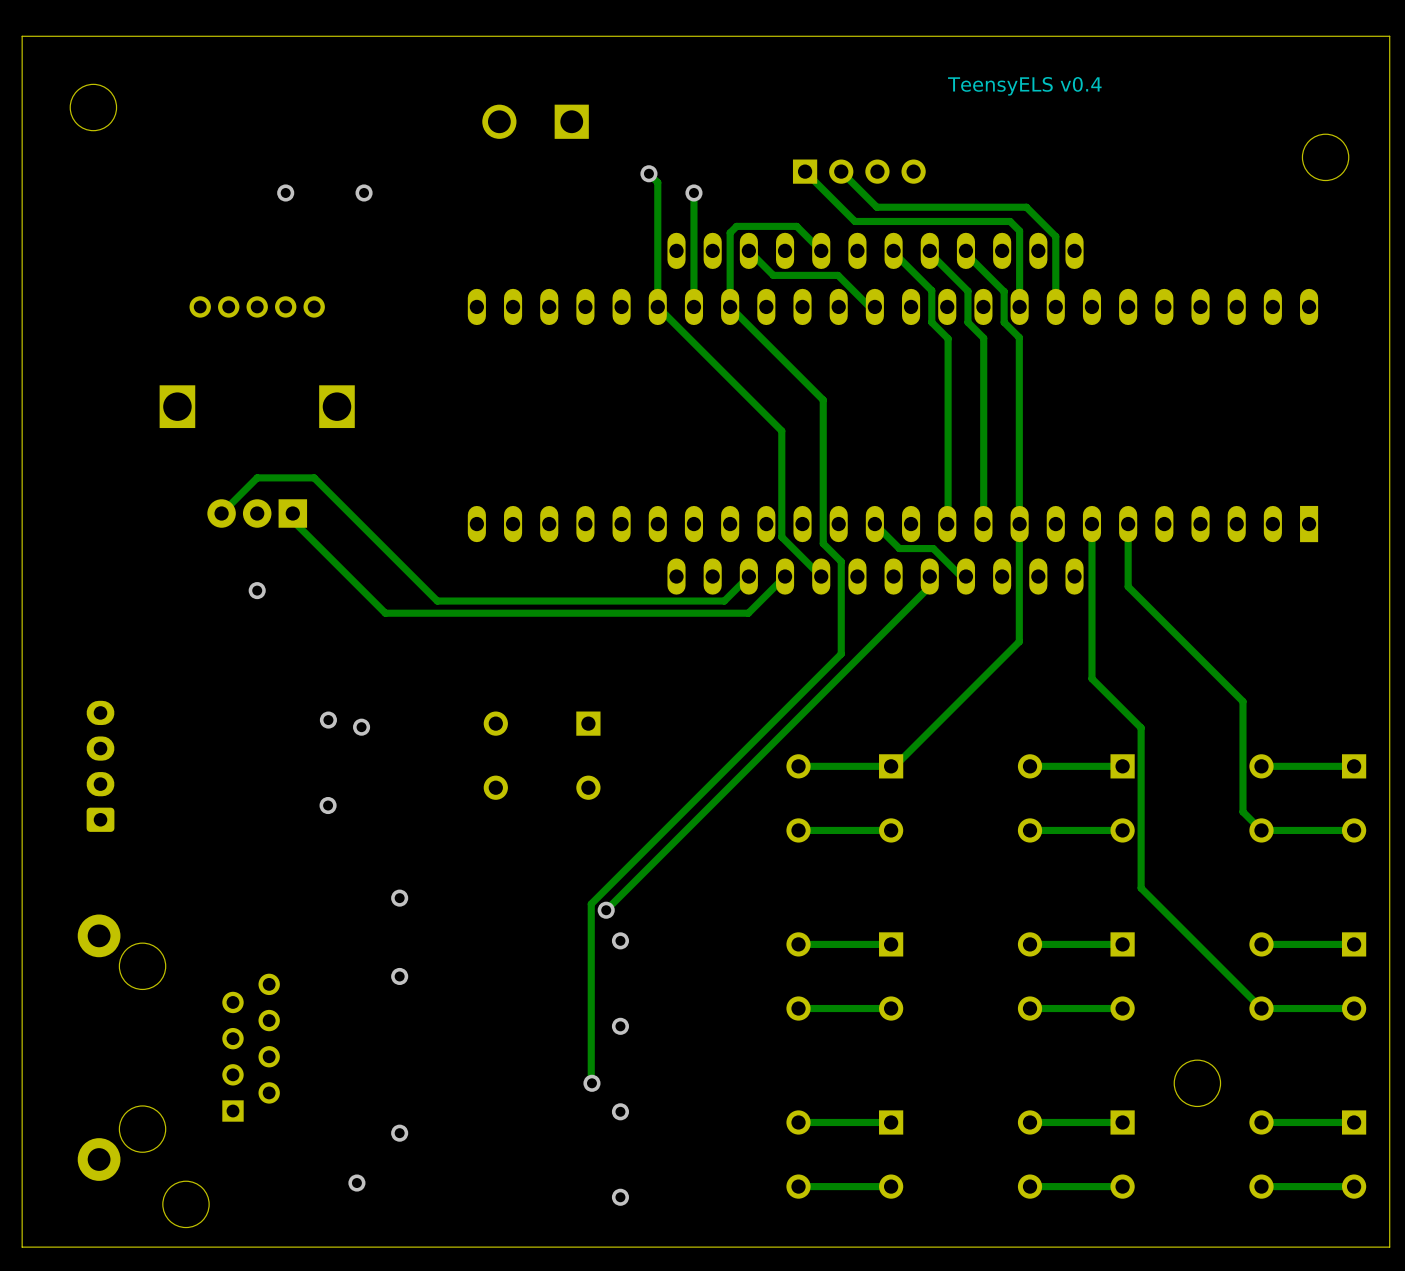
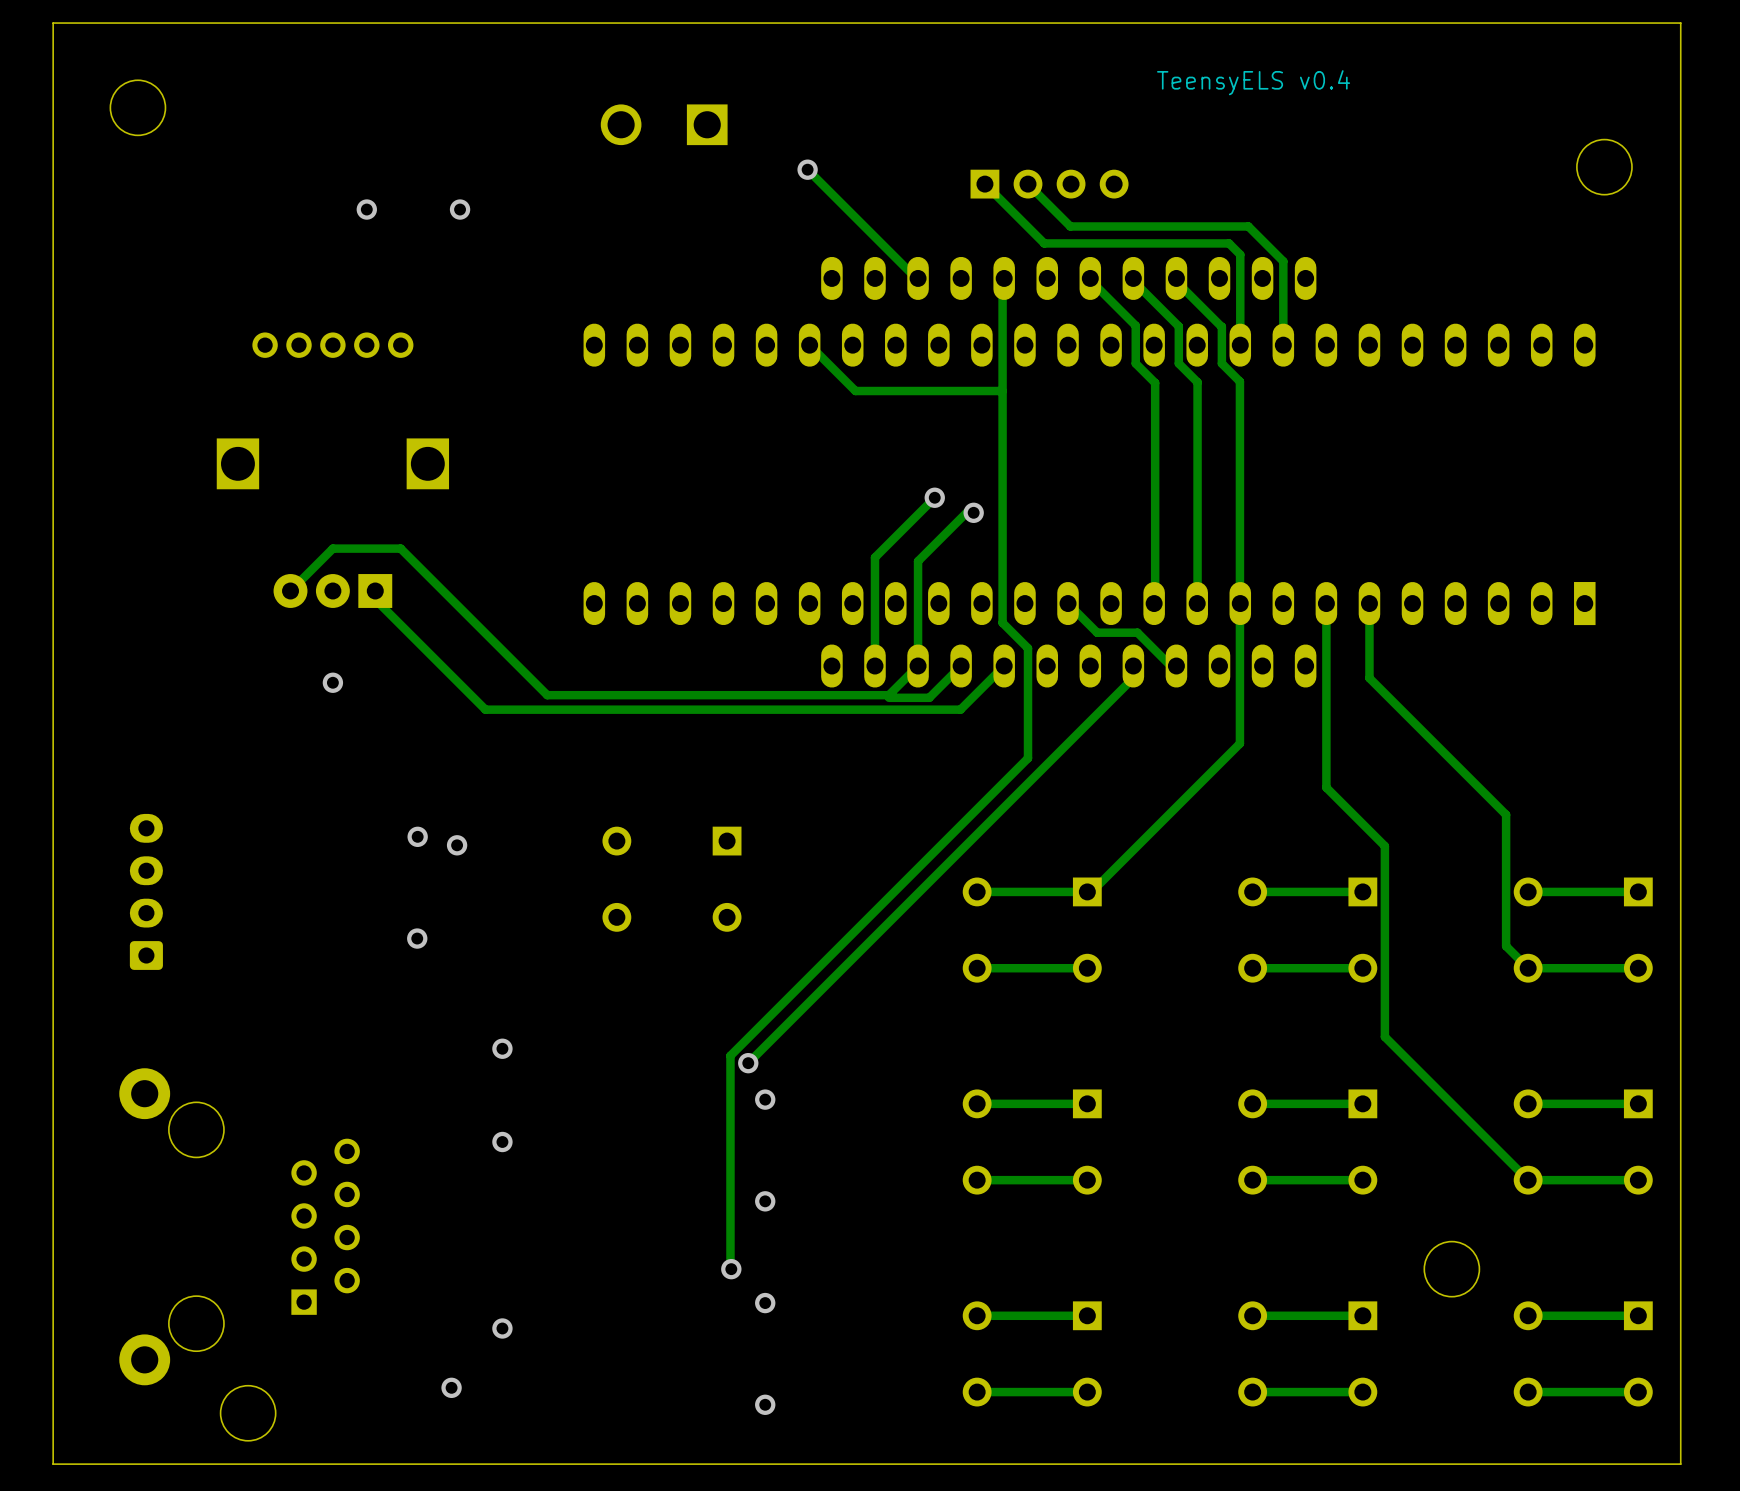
track: (648, 173) (657, 182) (657, 306) -> none
via position: (648, 173) -> (807, 169)
track: (693, 192) (693, 306) -> none
via: (693, 192) -> none
track: (748, 250) (773, 275) (838, 275) (869, 306) (874, 306) -> (918, 278) (807, 169)
track: (821, 250) (796, 226) (736, 226) (730, 232) (730, 306) (823, 400) (823, 543) -> (1004, 278) (1002, 280) (1002, 622) (1006, 626)
track: (696, 345) (781, 430) (781, 537) (821, 576) -> (855, 391) (1002, 391)
track: none -> (934, 497) (874, 557) (874, 666)
via: none -> (934, 497)
track: none -> (973, 512) (966, 512) (918, 561) (918, 666)
via: none -> (973, 512)
track: none -> (1004, 666) (960, 709) (917, 709)
track: (758, 603) (748, 613) -> (929, 697) (888, 697)

